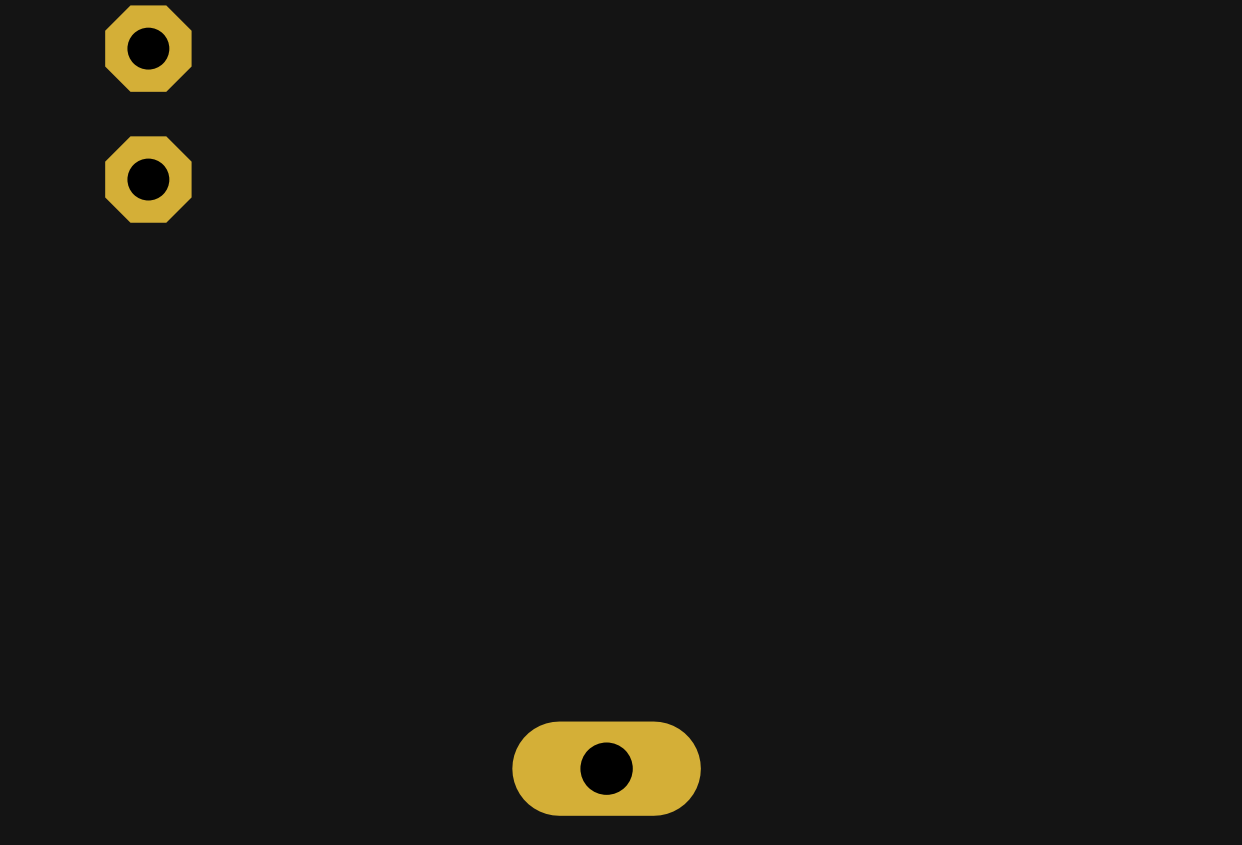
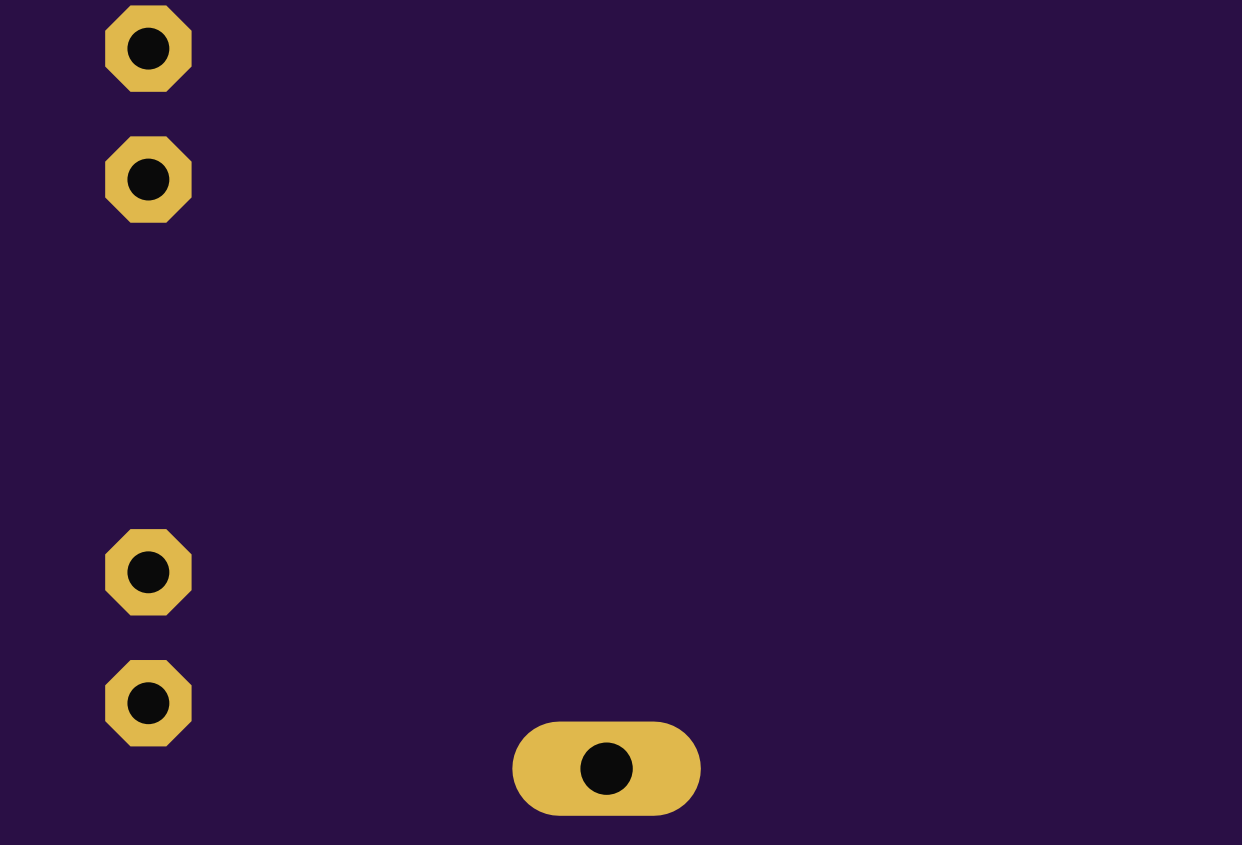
part: none -> (148, 637)

